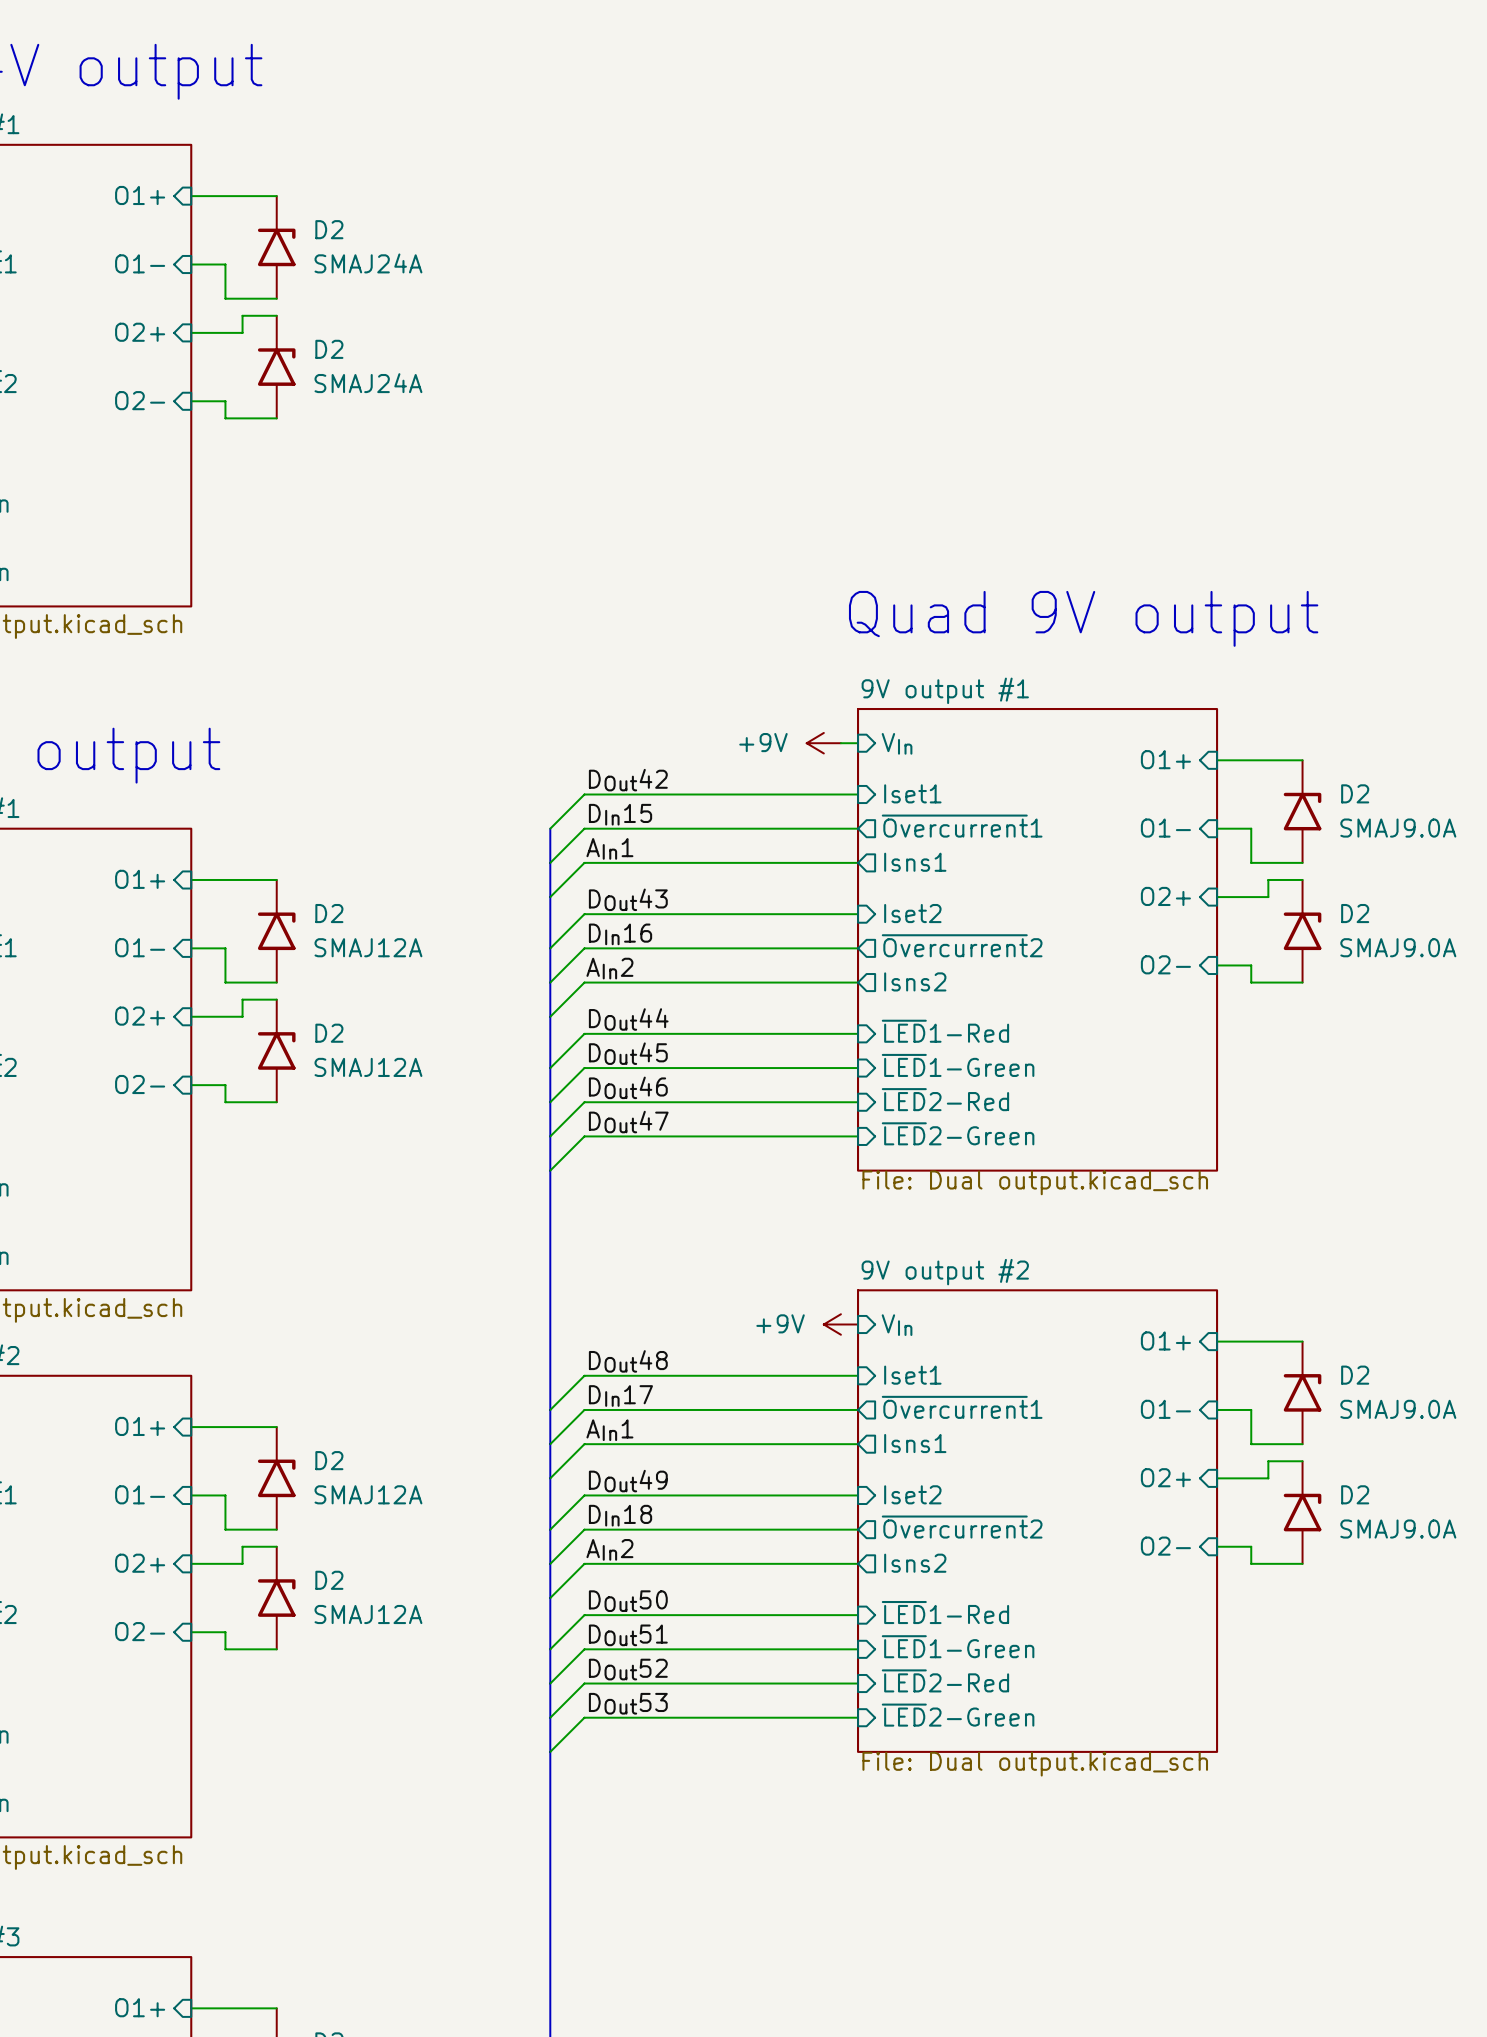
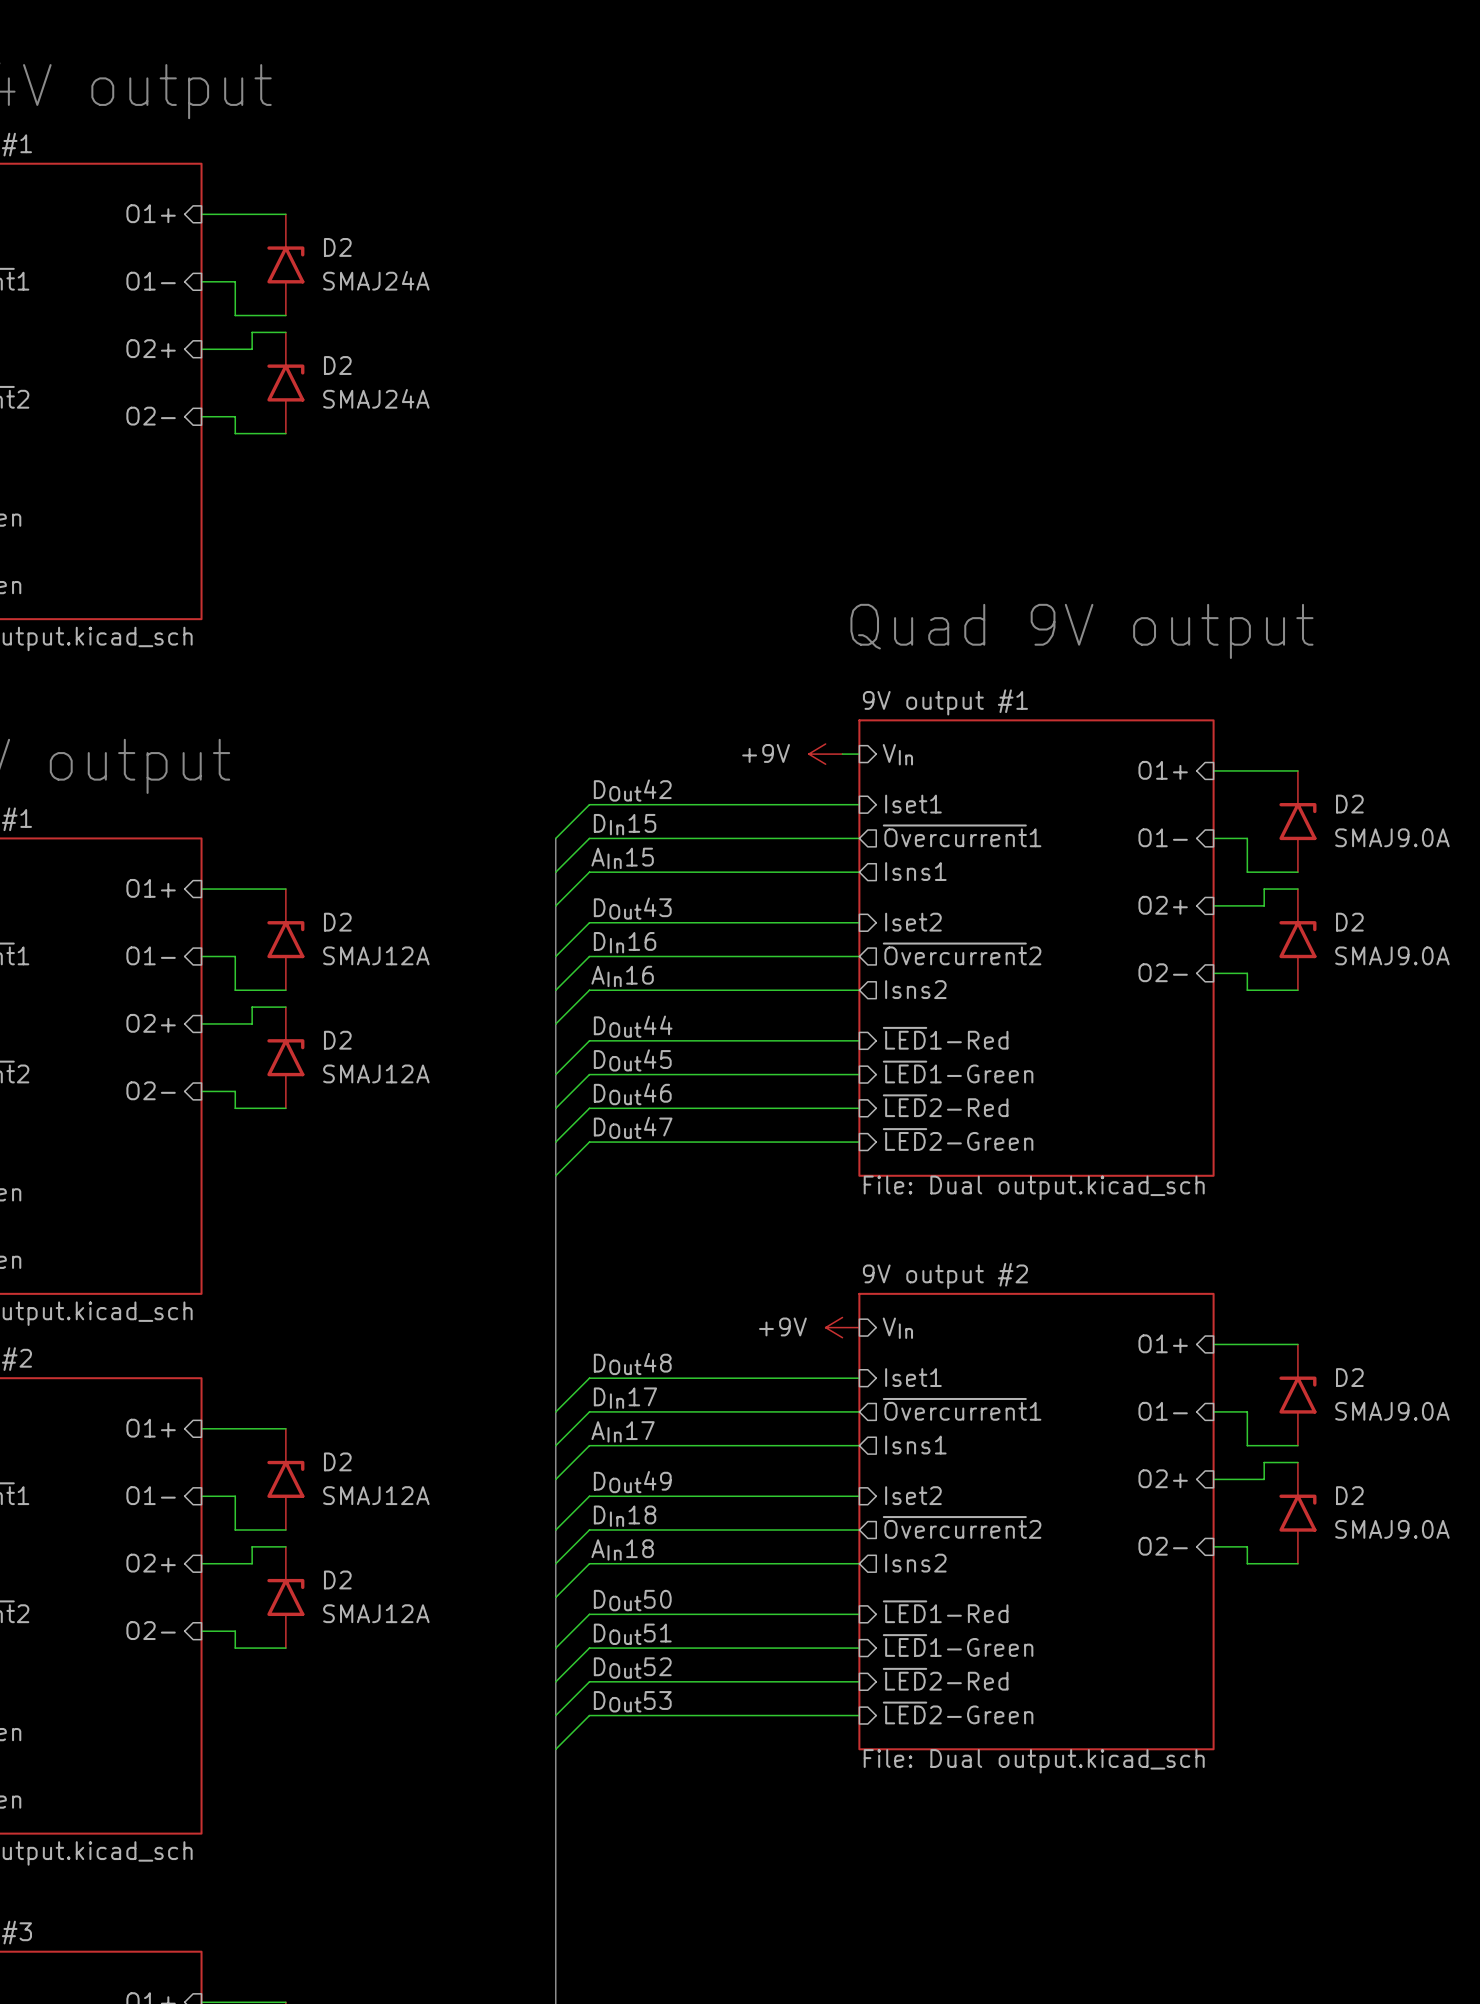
label: AIn1 (609, 848) -> AIn15 (622, 858)
label: AIn2 (609, 968) -> AIn16 (622, 976)
label: AIn1 (609, 1430) -> AIn17 (623, 1431)
label: AIn2 (609, 1549) -> AIn18 (622, 1549)

